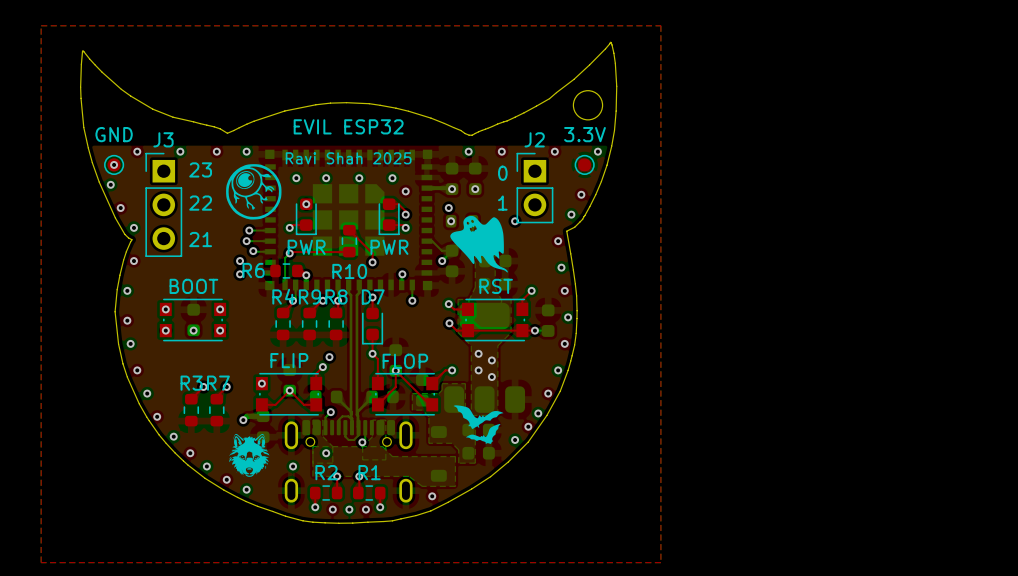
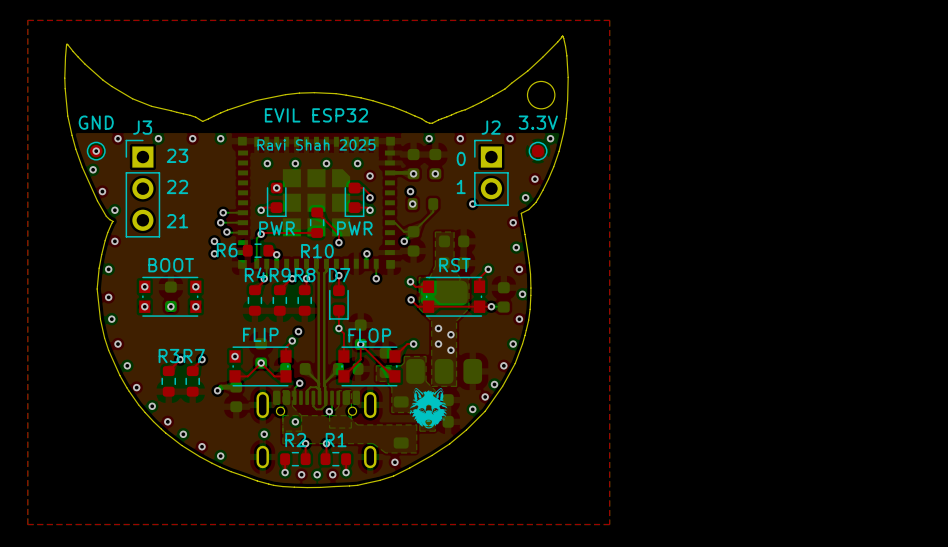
drawing: [226, 164, 282, 220] -> none
drawing: [450, 215, 508, 273] -> none
drawing: [453, 405, 504, 444] -> none
drawing position: (249, 456) -> (428, 409)

